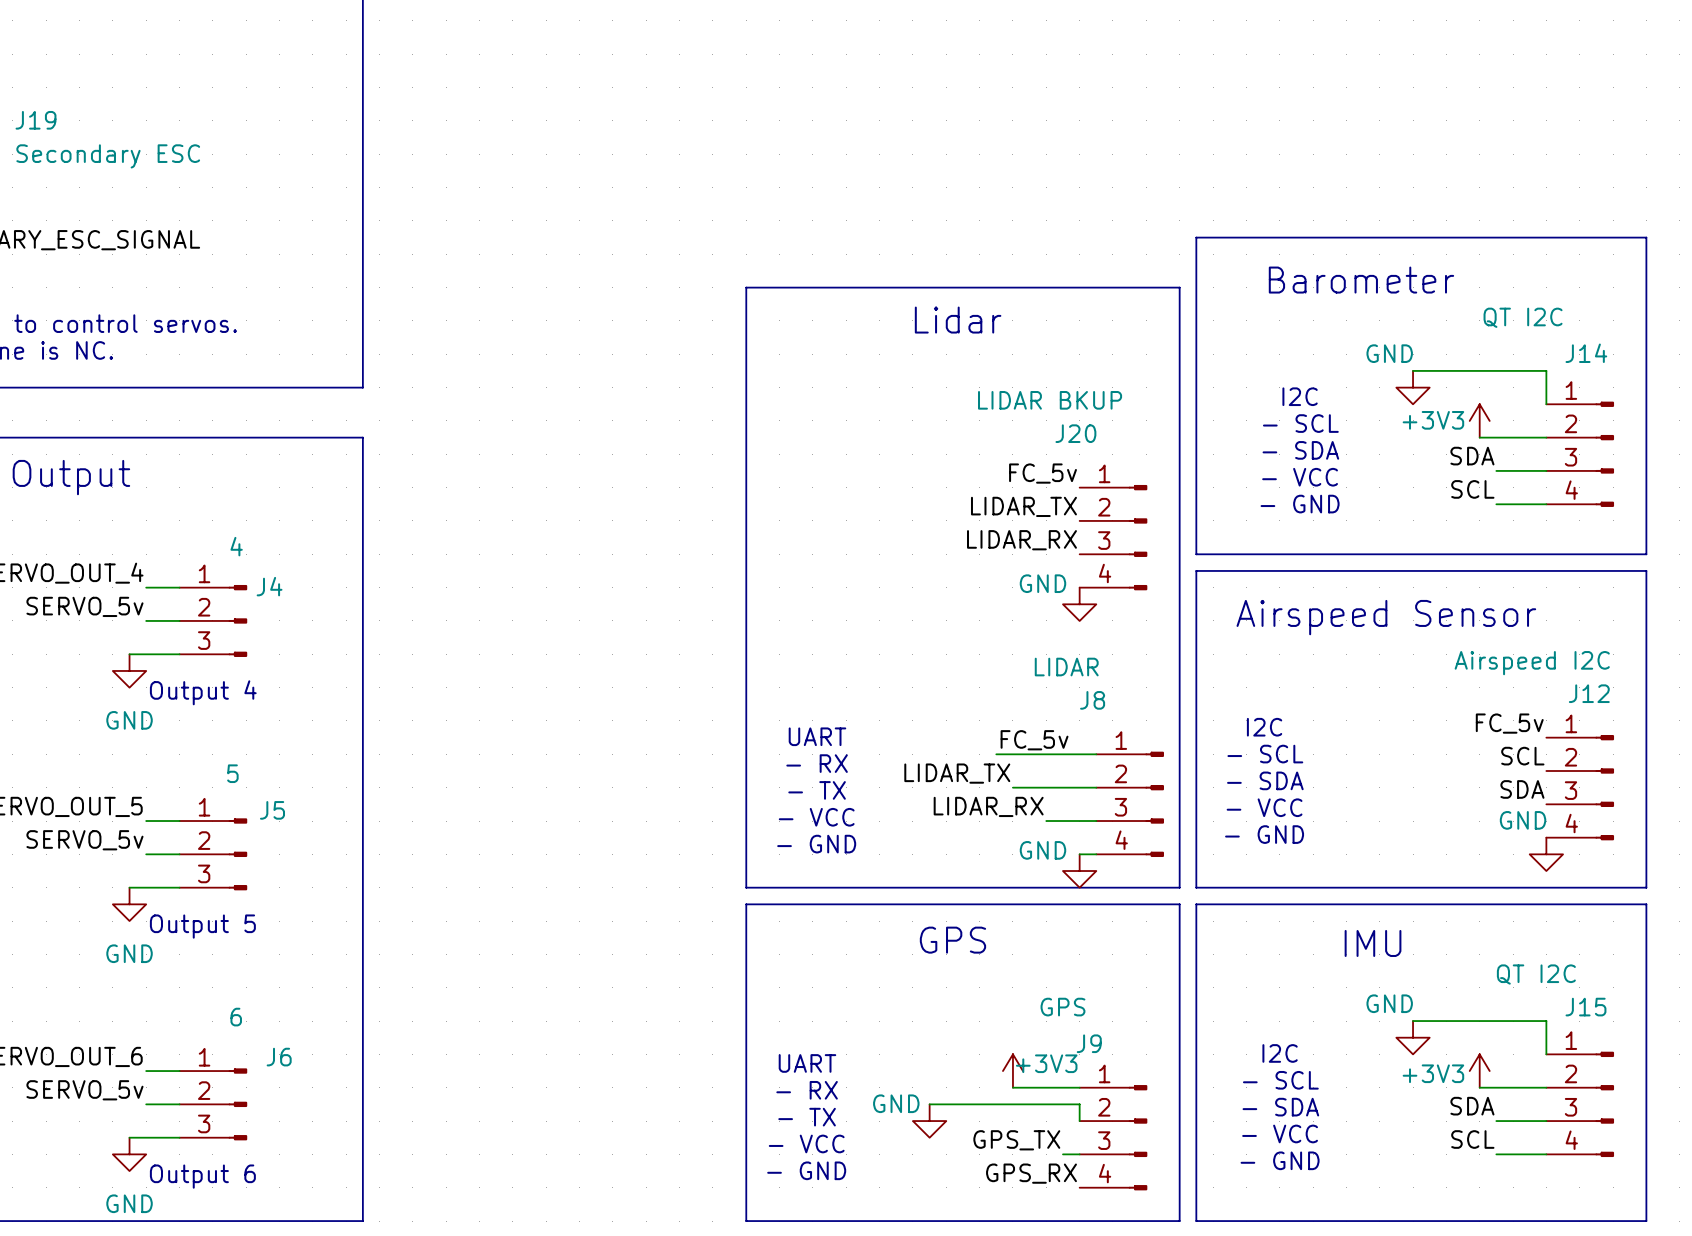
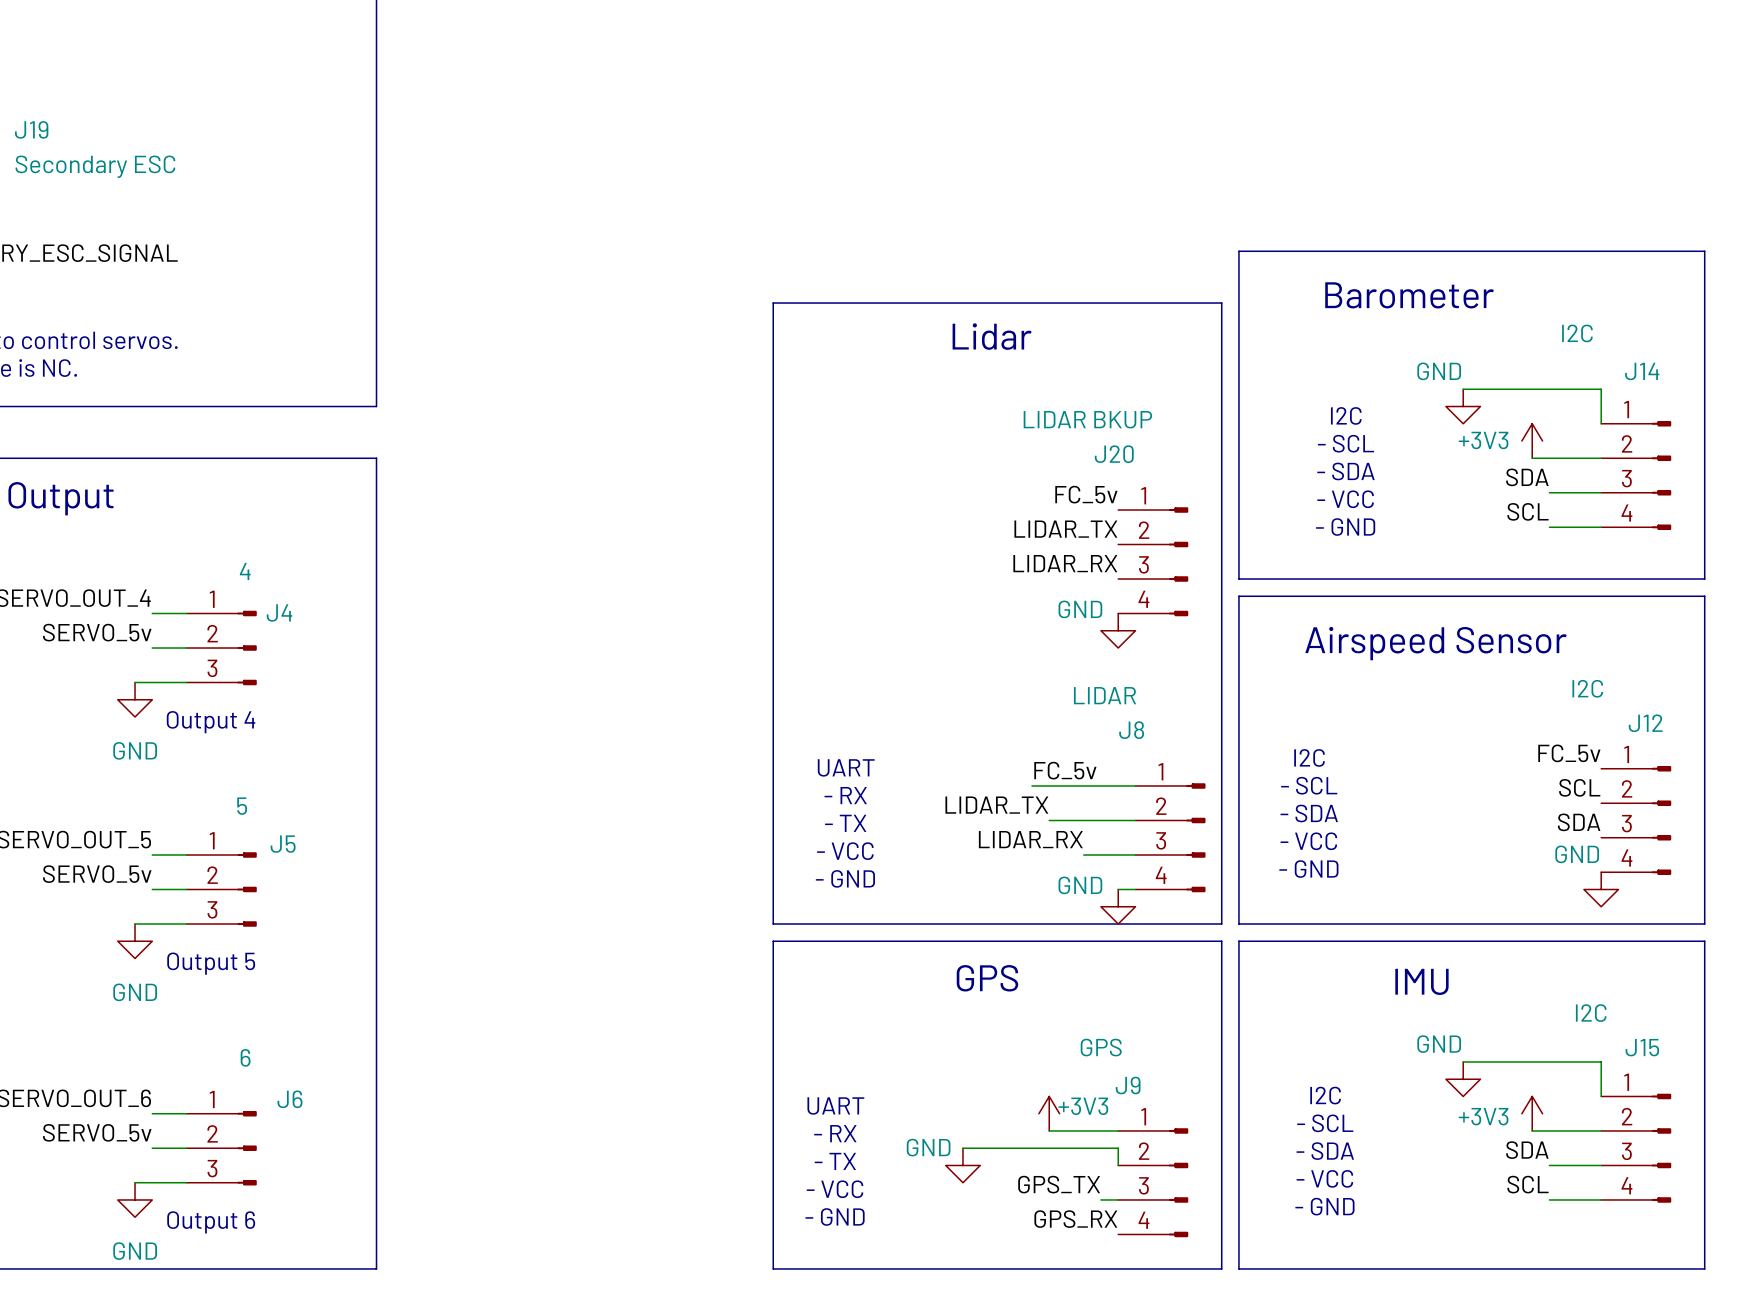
J14 value: QT I2C (1523, 317) -> I2C (1577, 333)
J12 value: Airspeed I2C (1532, 663) -> I2C (1587, 688)
J15 value: QT I2C (1536, 974) -> I2C (1591, 1013)

